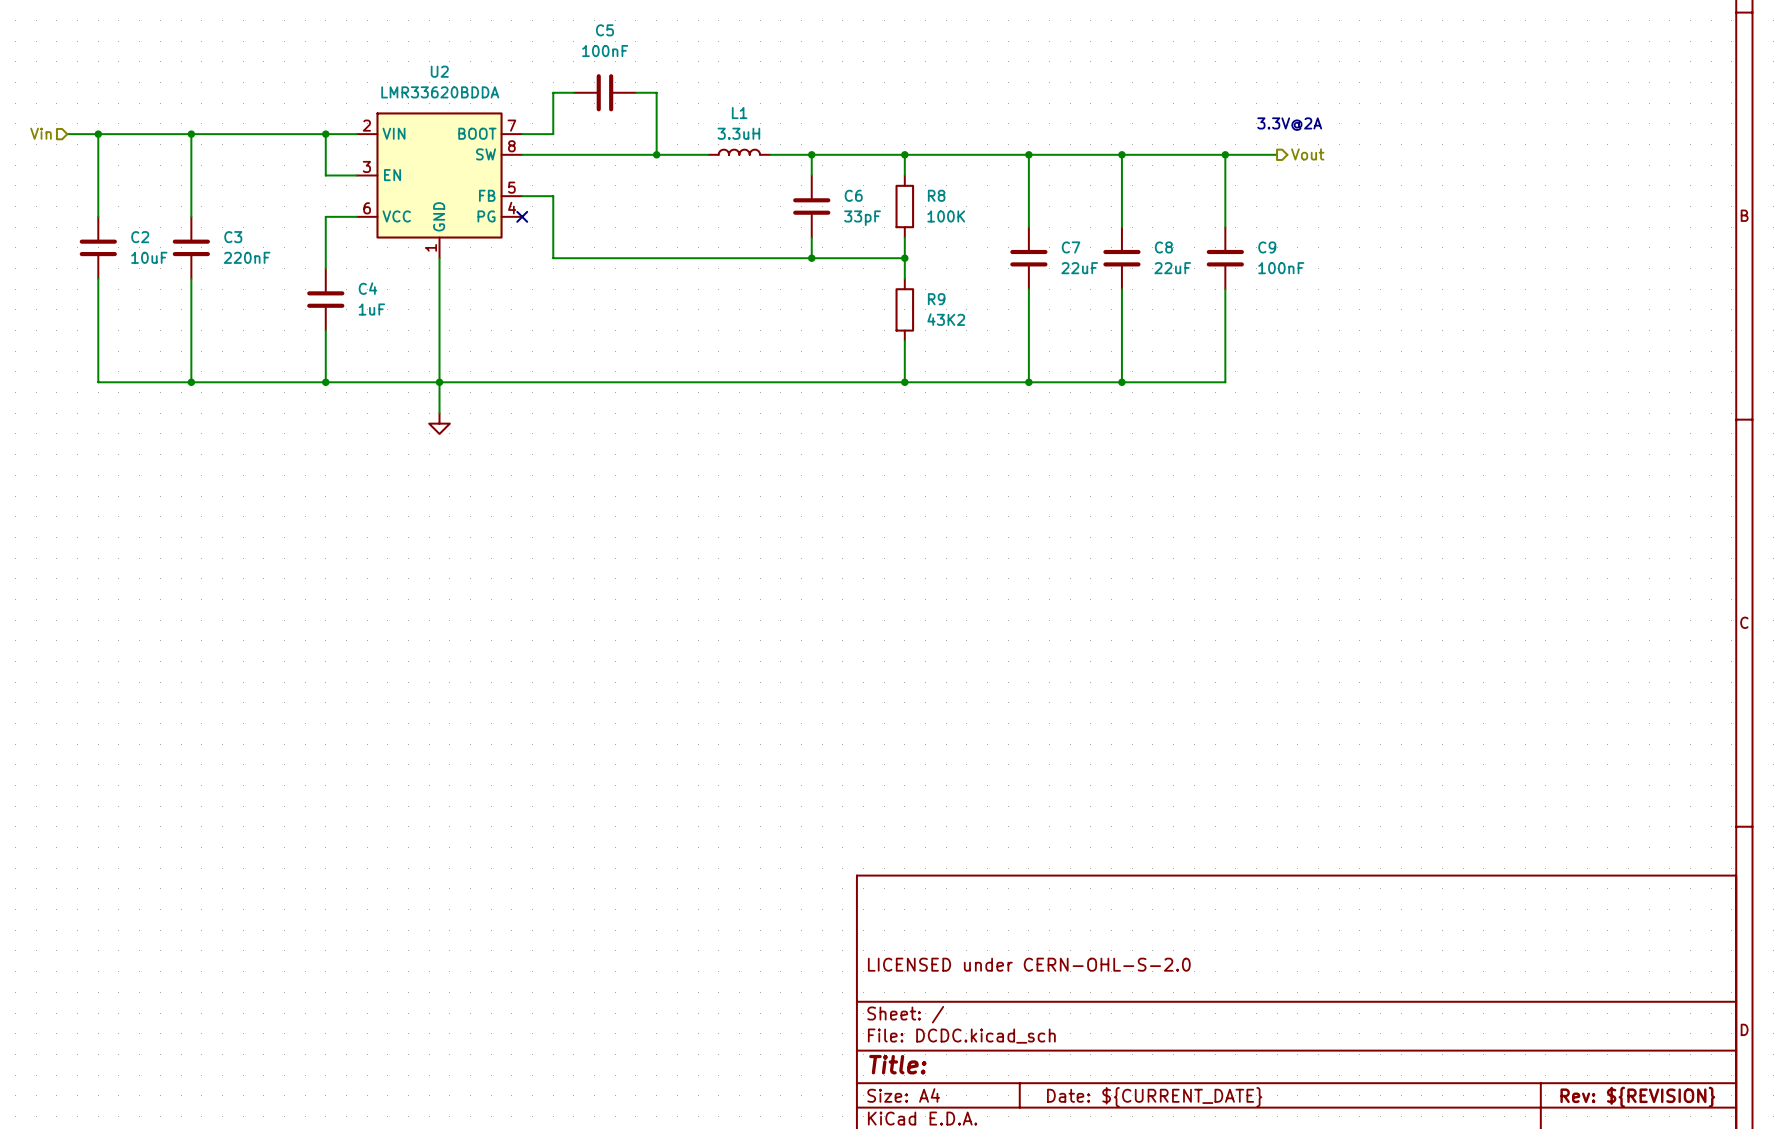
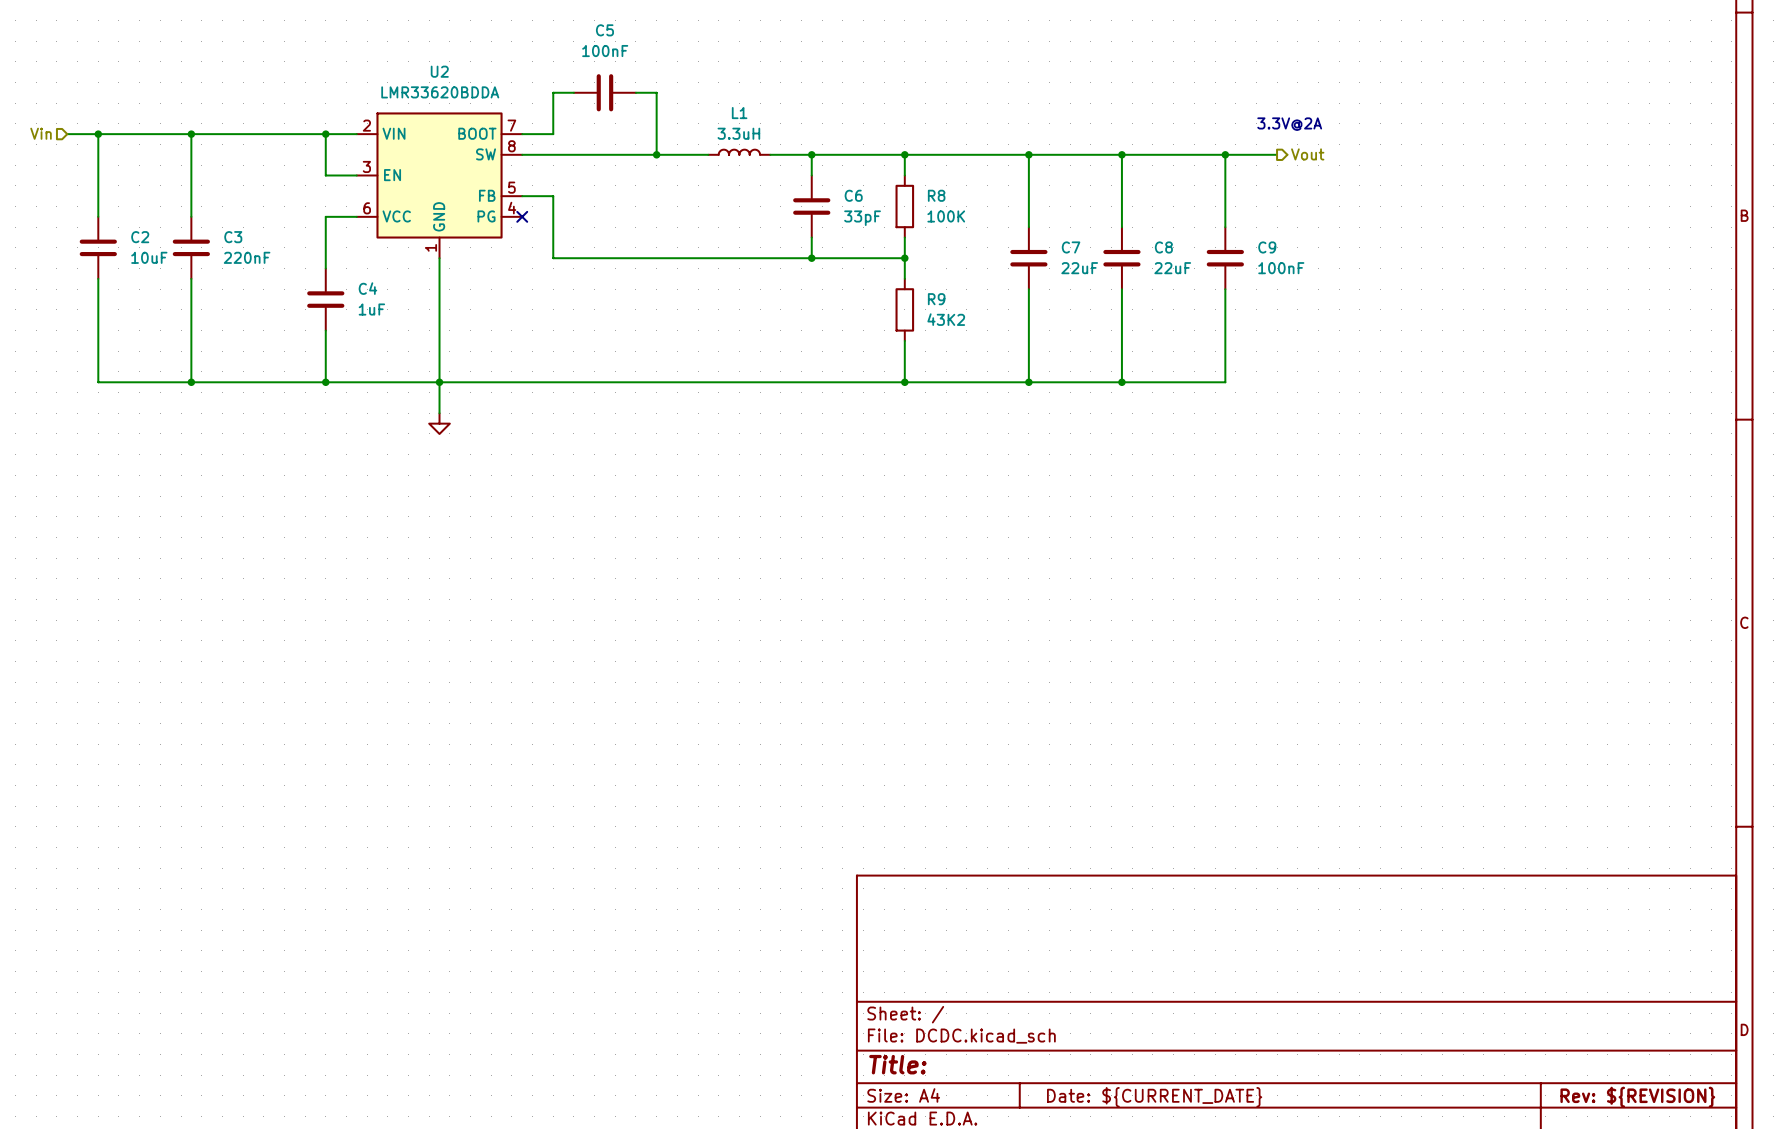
title block: LICENSED under CERN-OHL-S-2.0 (1029, 964) -> none

